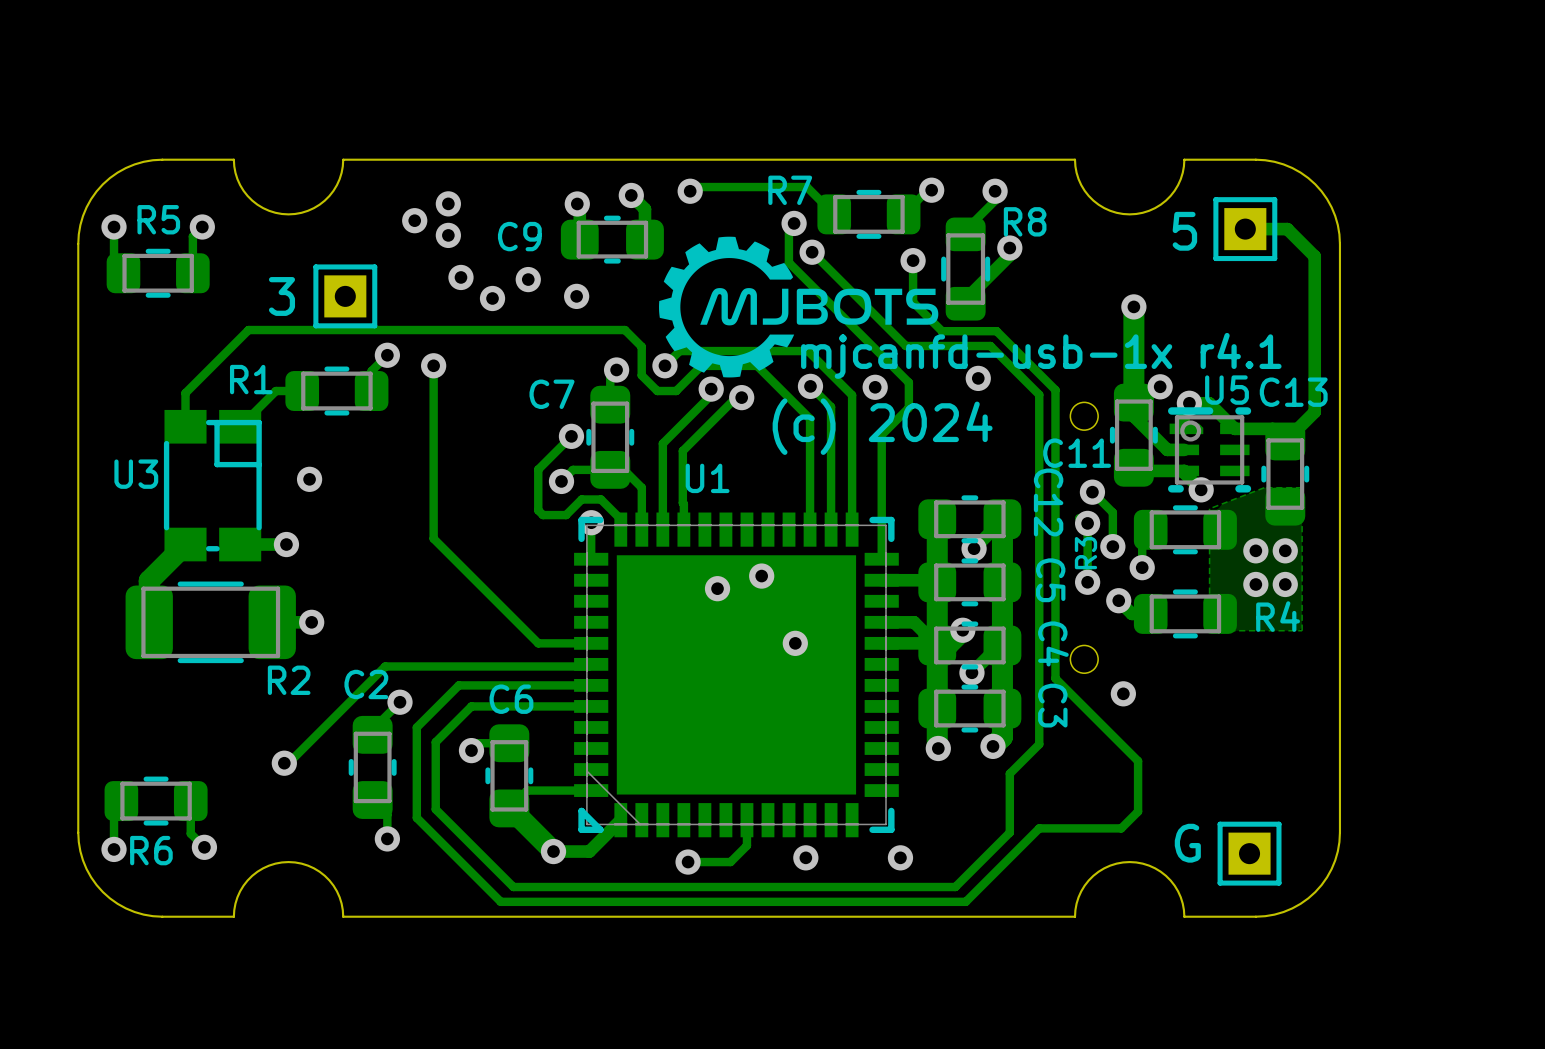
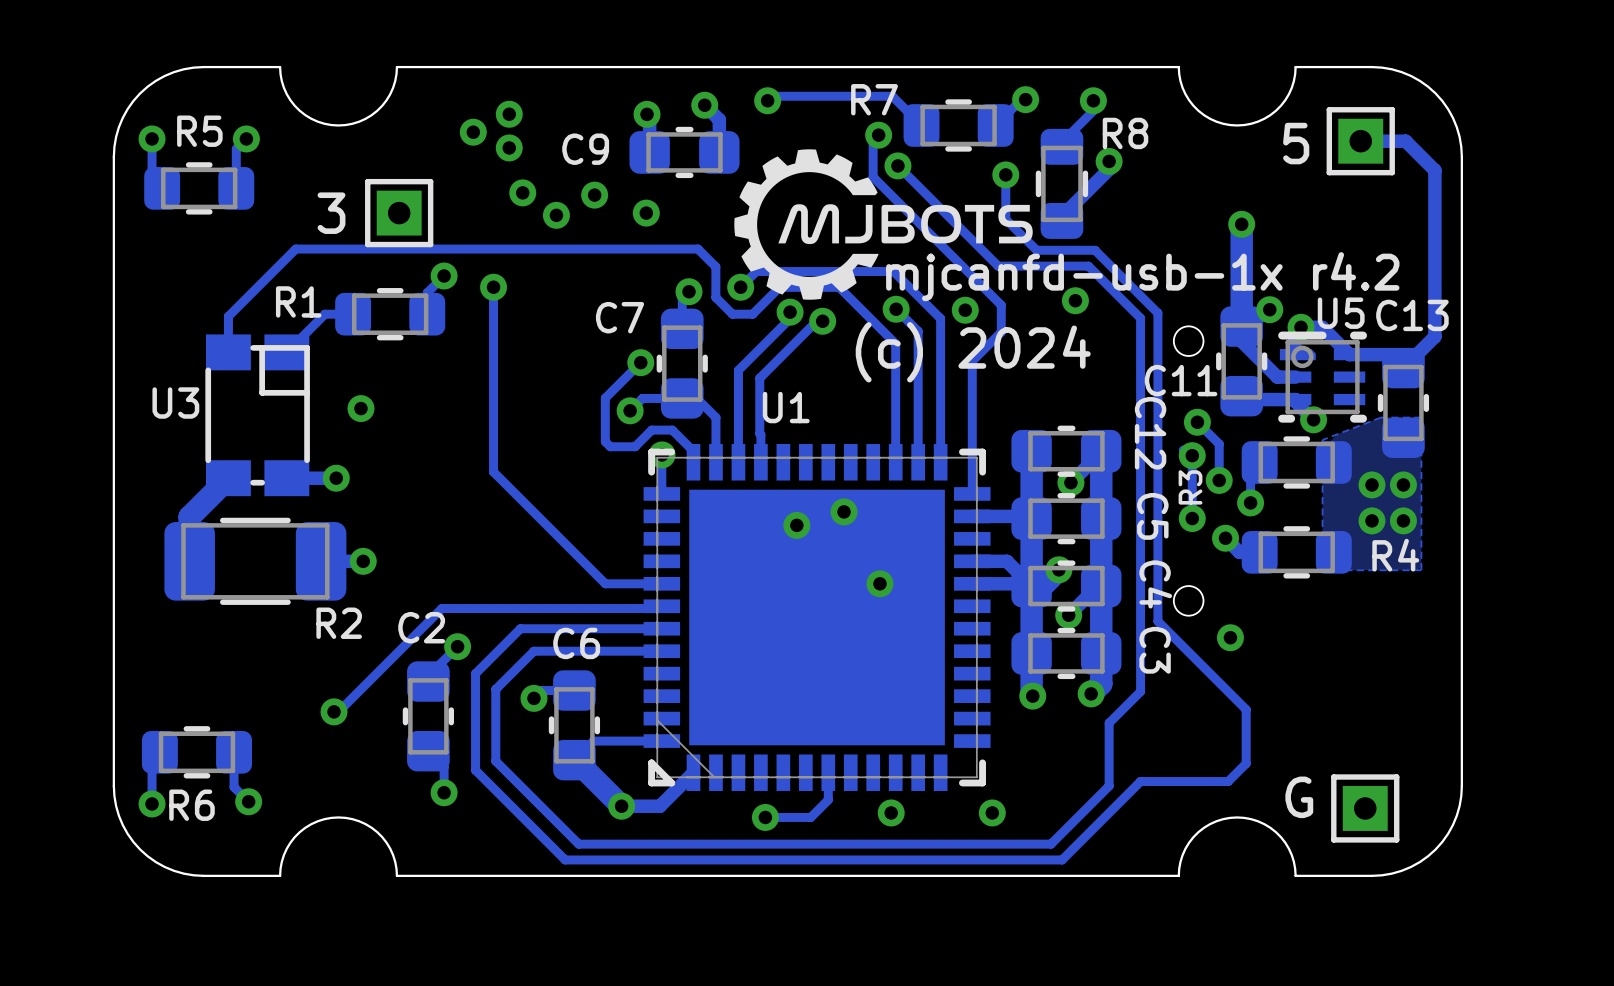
text: mjcanfd-usb-1x r4.1 (1041, 355) -> mjcanfd-usb-1x r4.2 (1142, 276)

